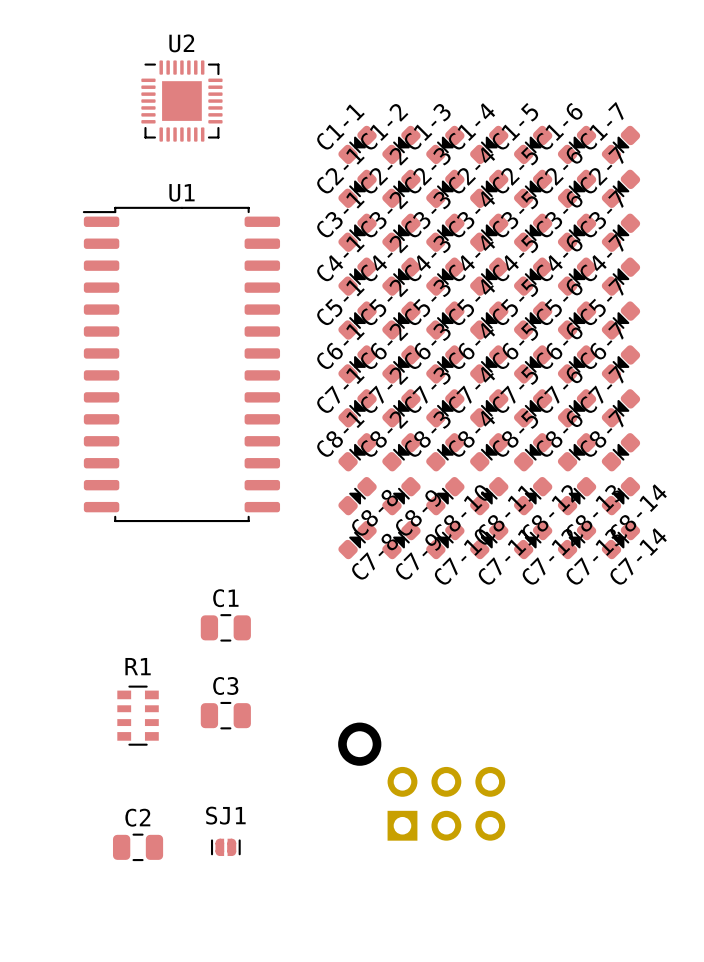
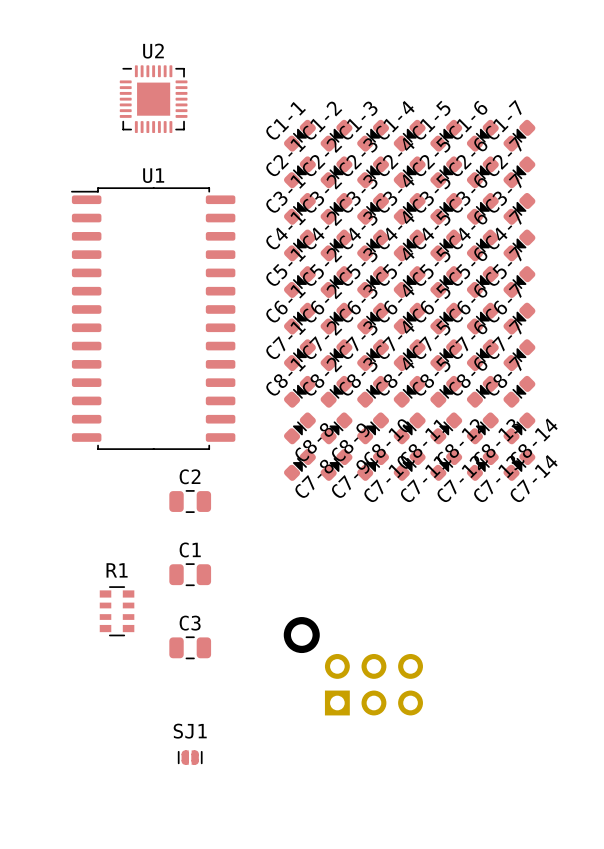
C1 position: (225, 627) -> (190, 574)
C3 position: (225, 715) -> (190, 647)
C2 position: (138, 847) -> (190, 501)
SJ1 position: (225, 847) -> (190, 757)

